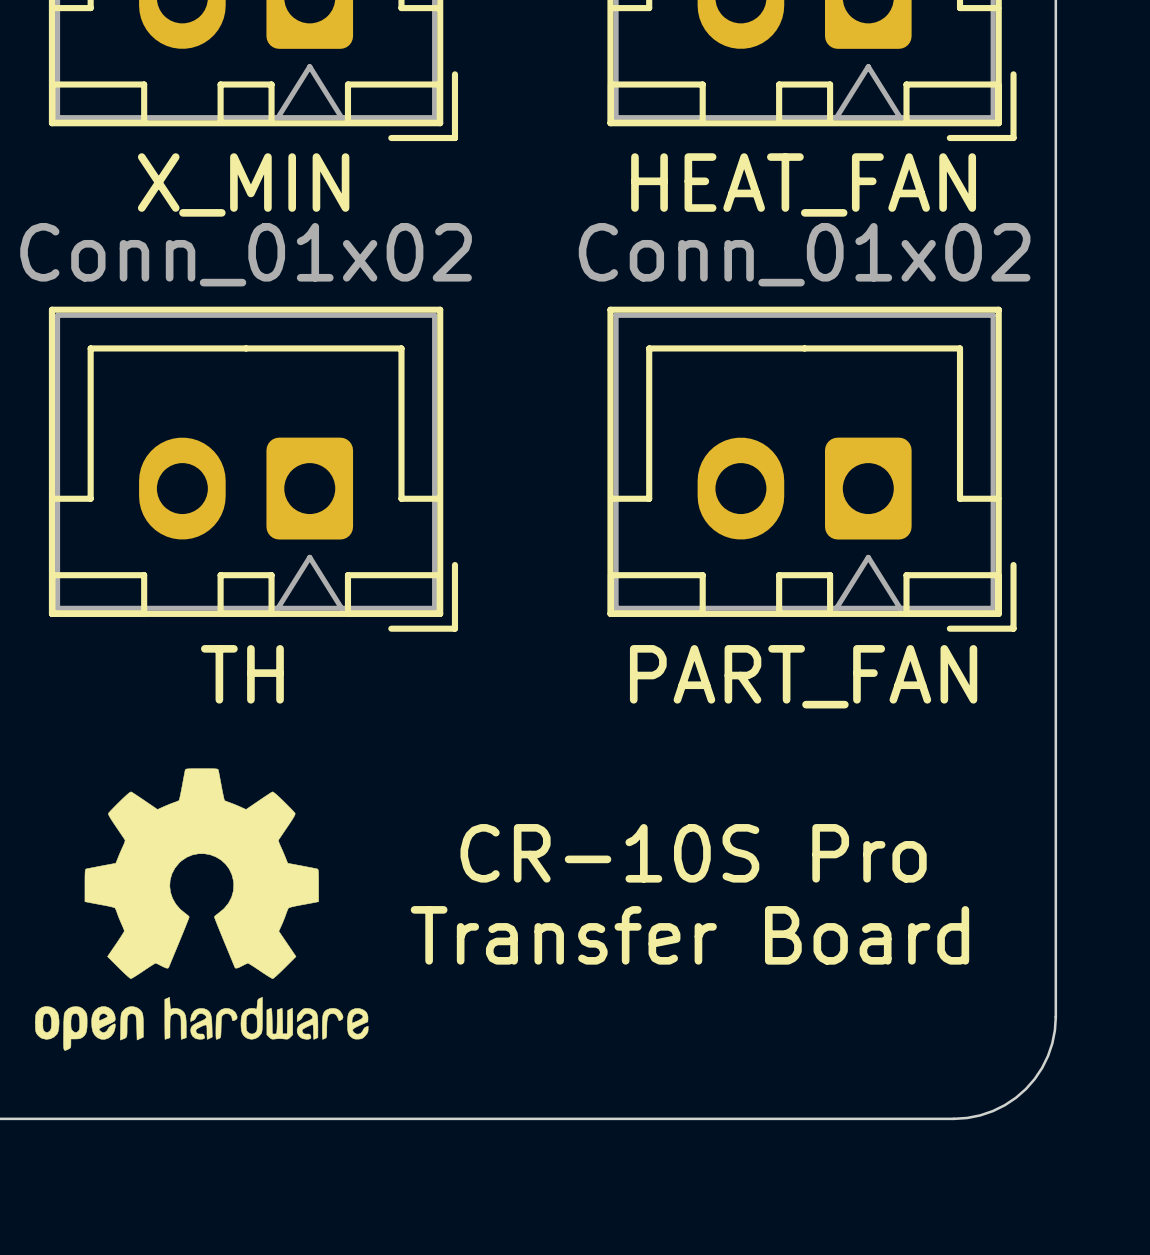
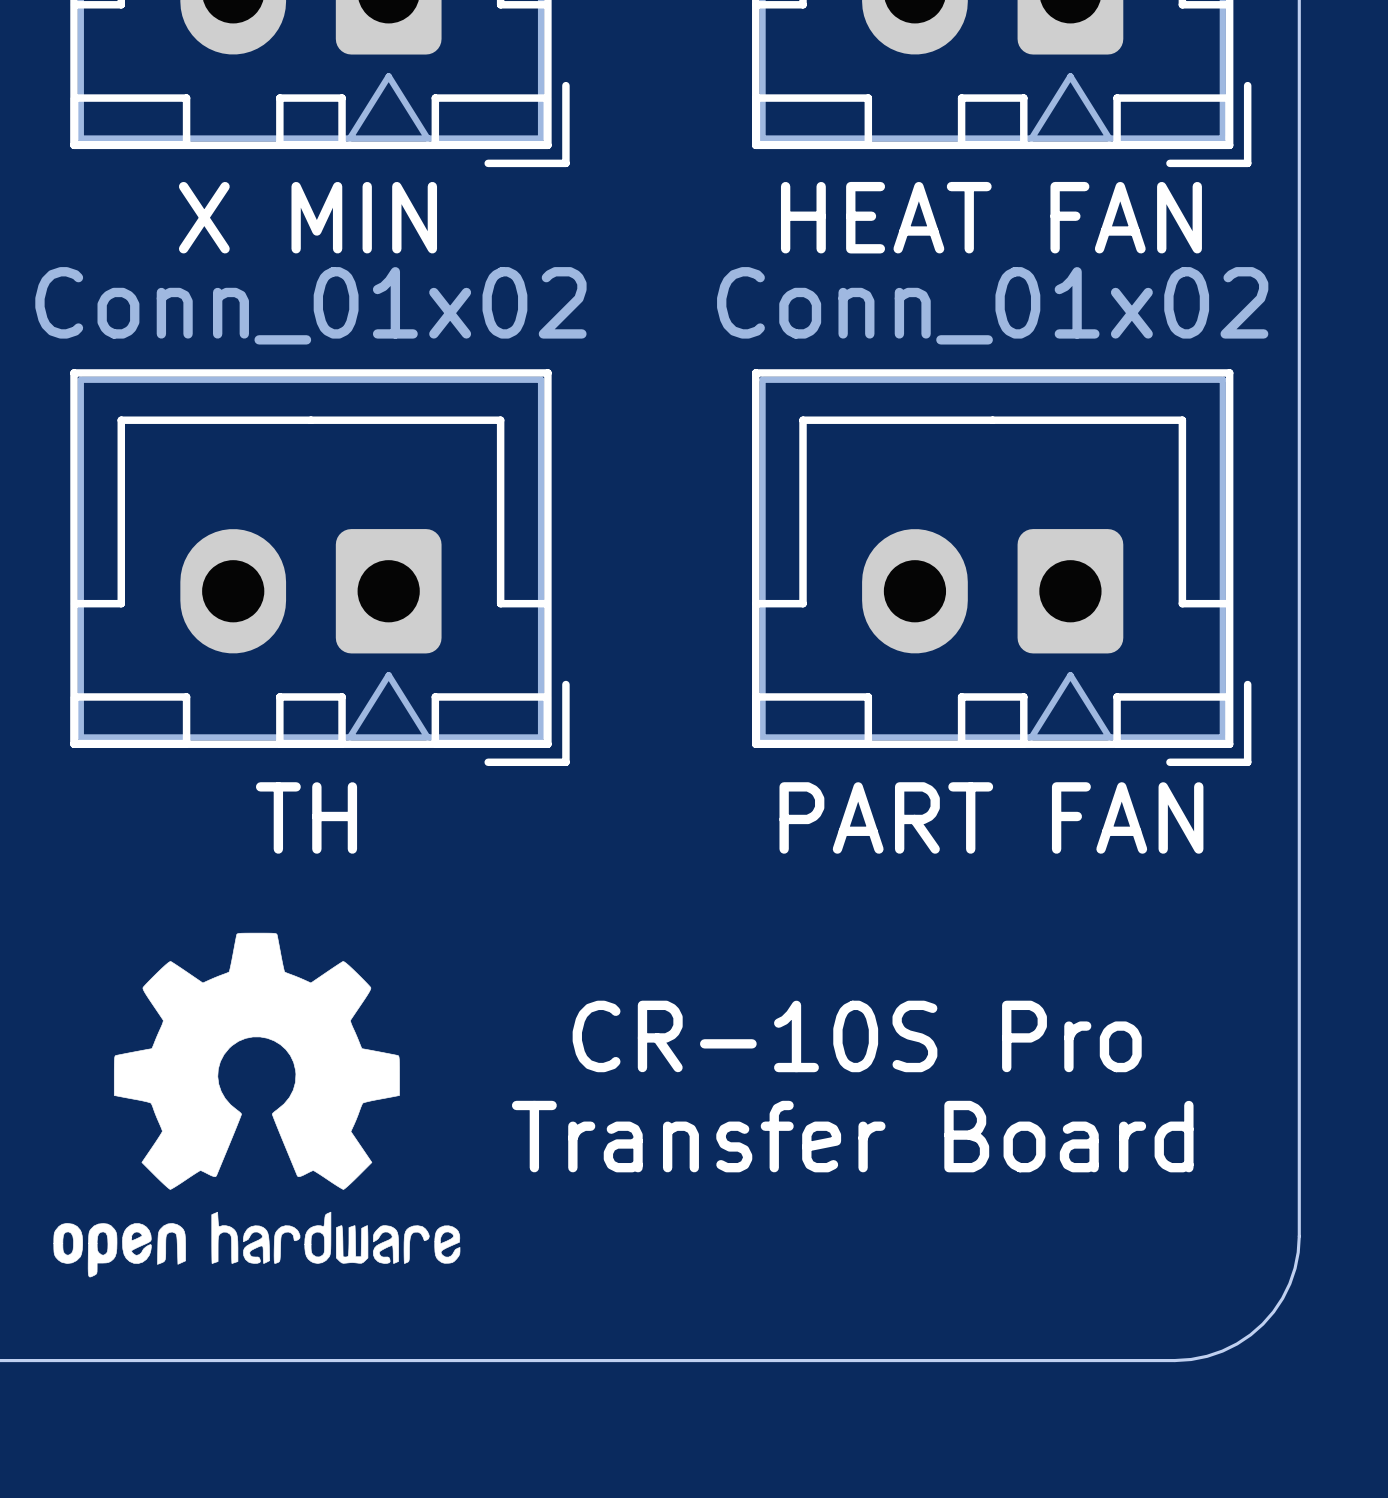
X_MIN name: X_MIN (243, 184) -> X MIN (307, 217)
HEAT_FAN name: HEAT_FAN (803, 184) -> HEAT FAN (991, 217)
PART_FAN name: PART_FAN (803, 676) -> PART FAN (991, 817)

